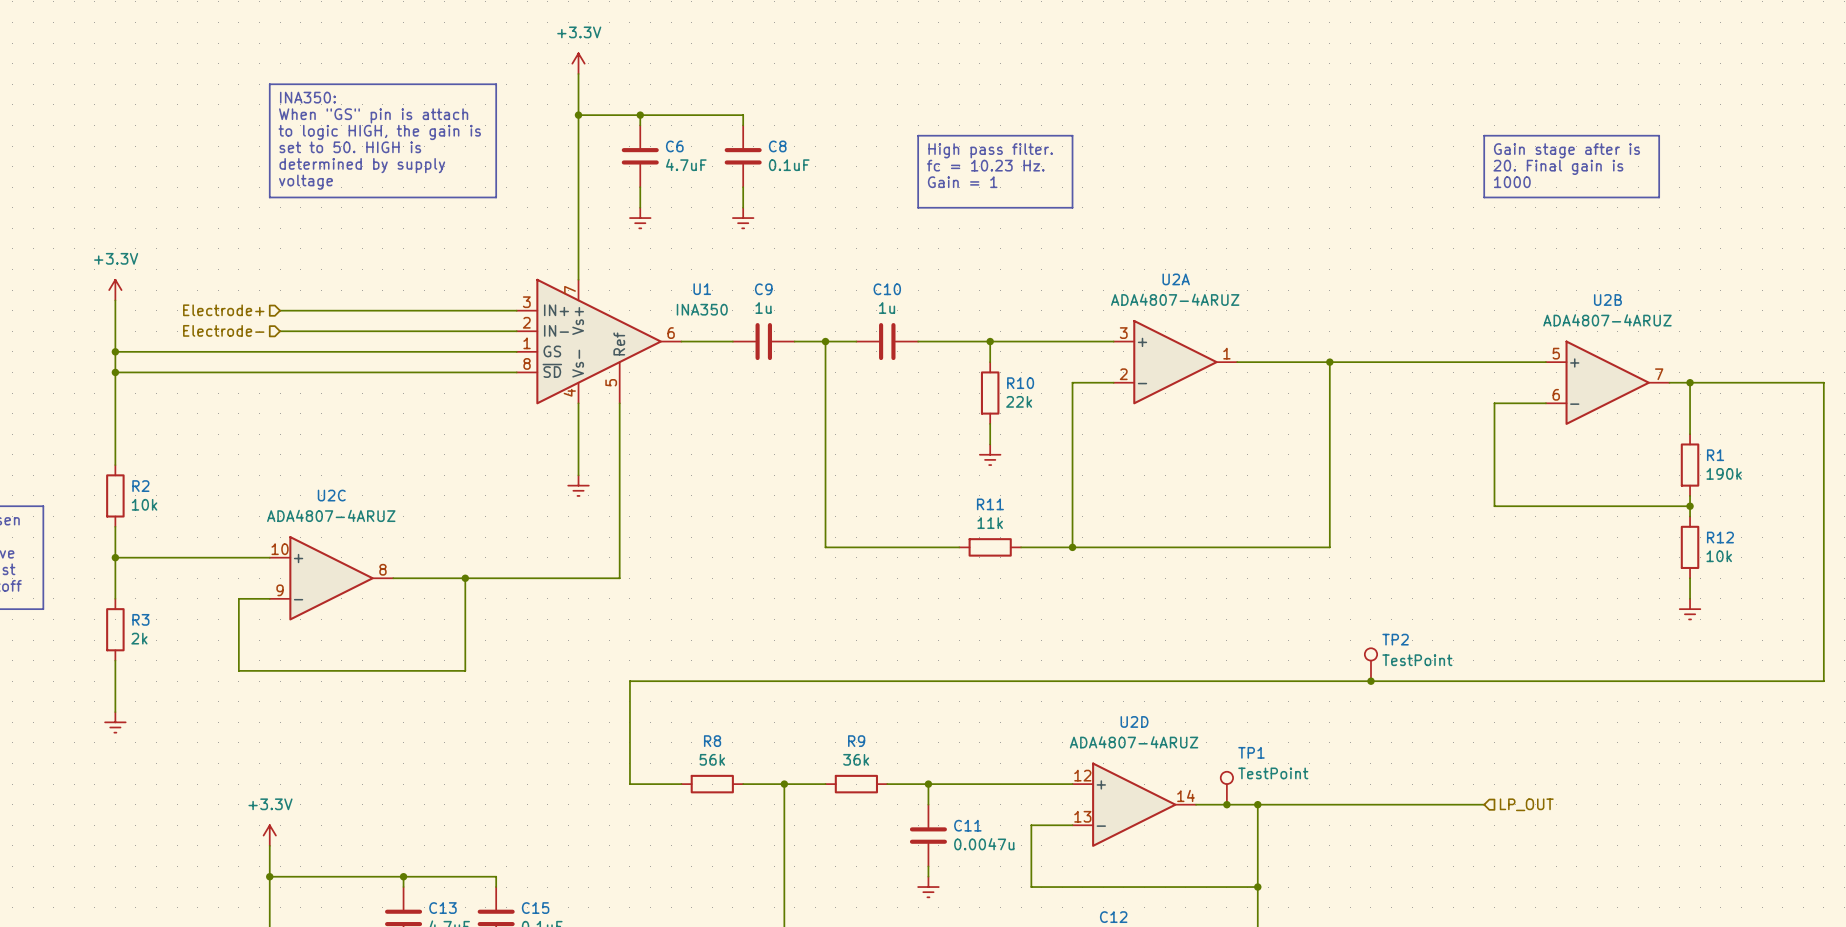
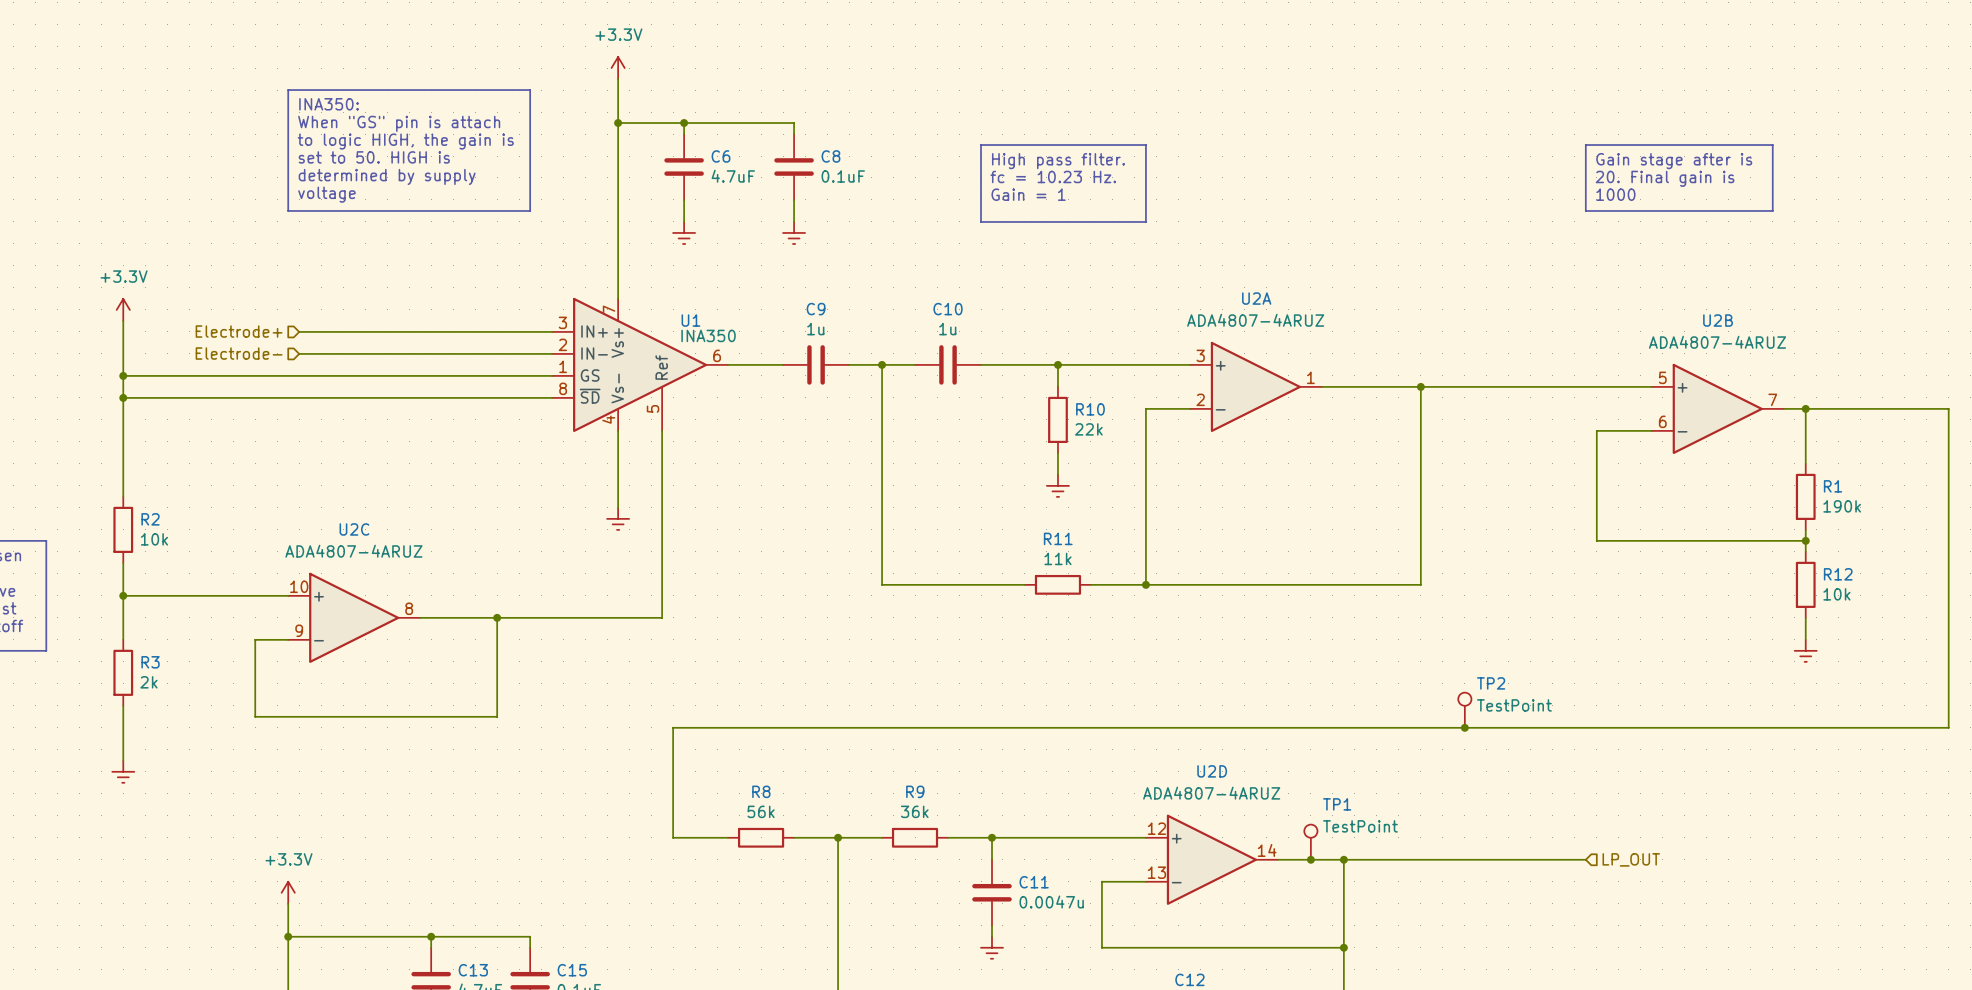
U1 name position: U1 (702, 289) -> U1 (690, 320)
U1 value position: INA350 (702, 309) -> INA350 (708, 335)

